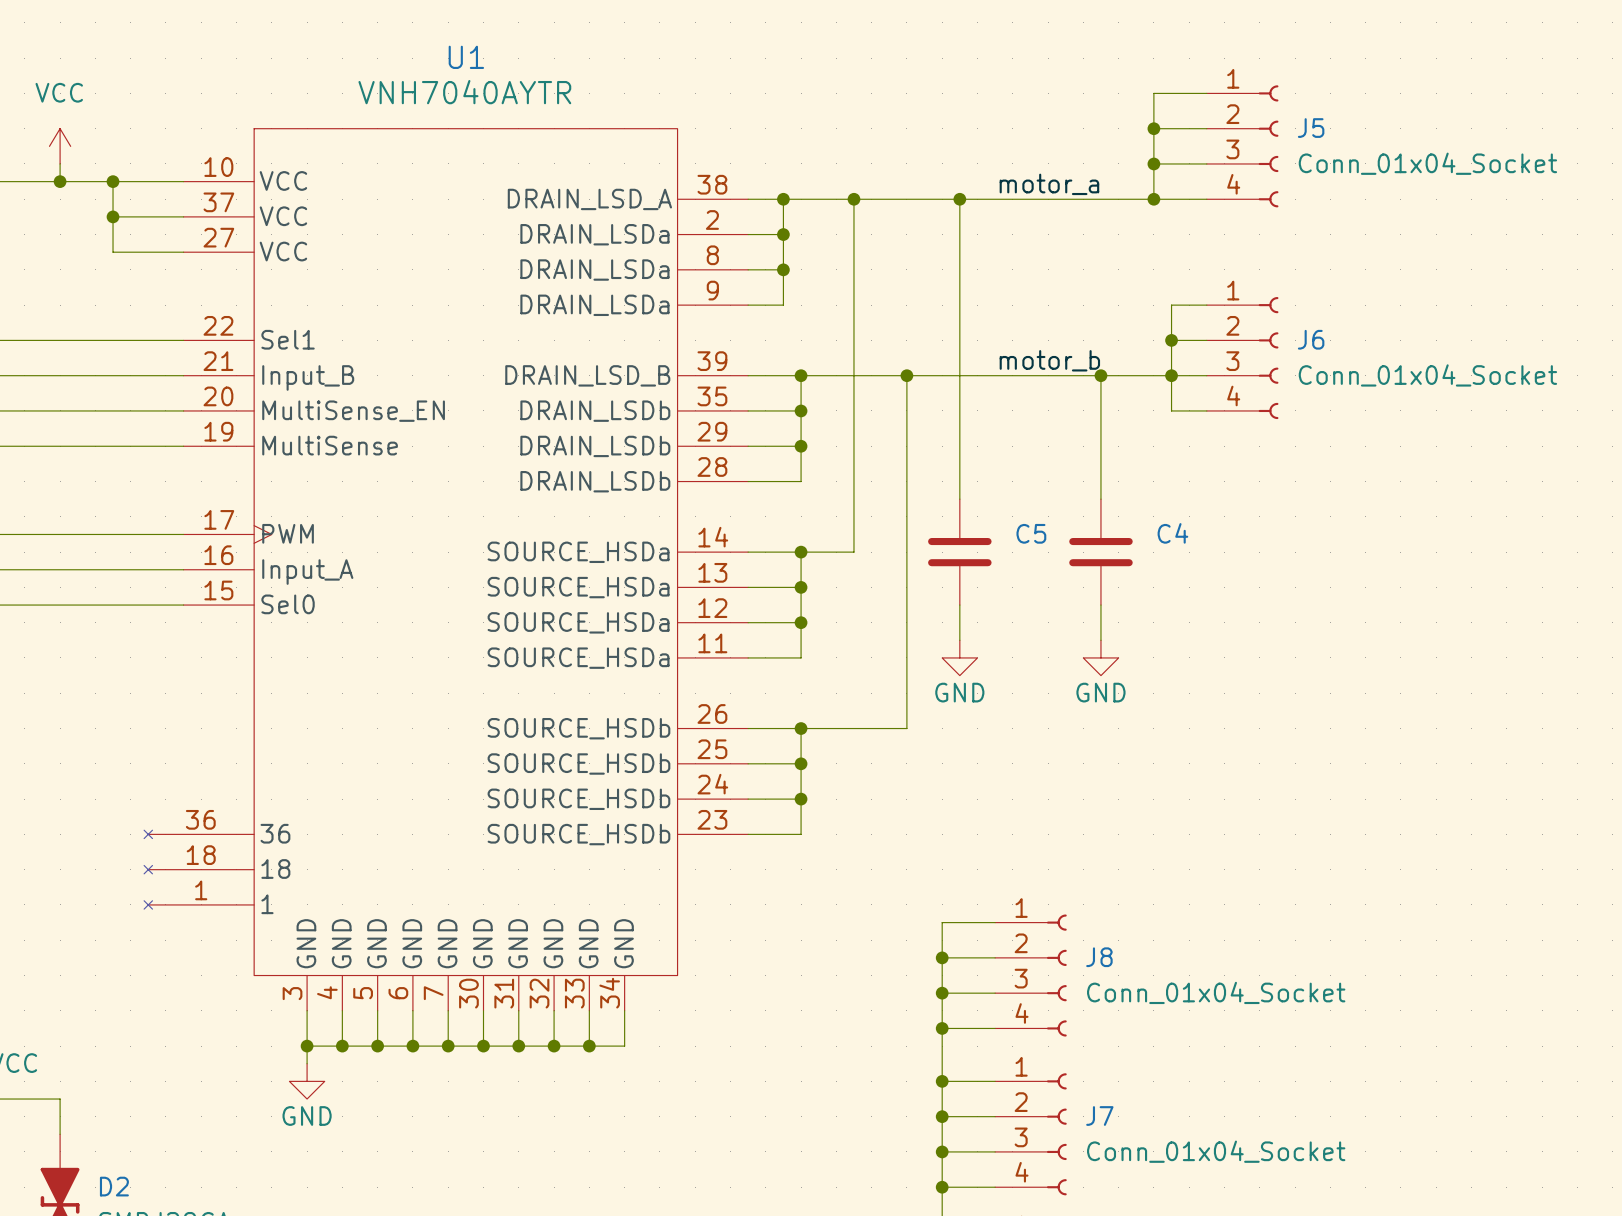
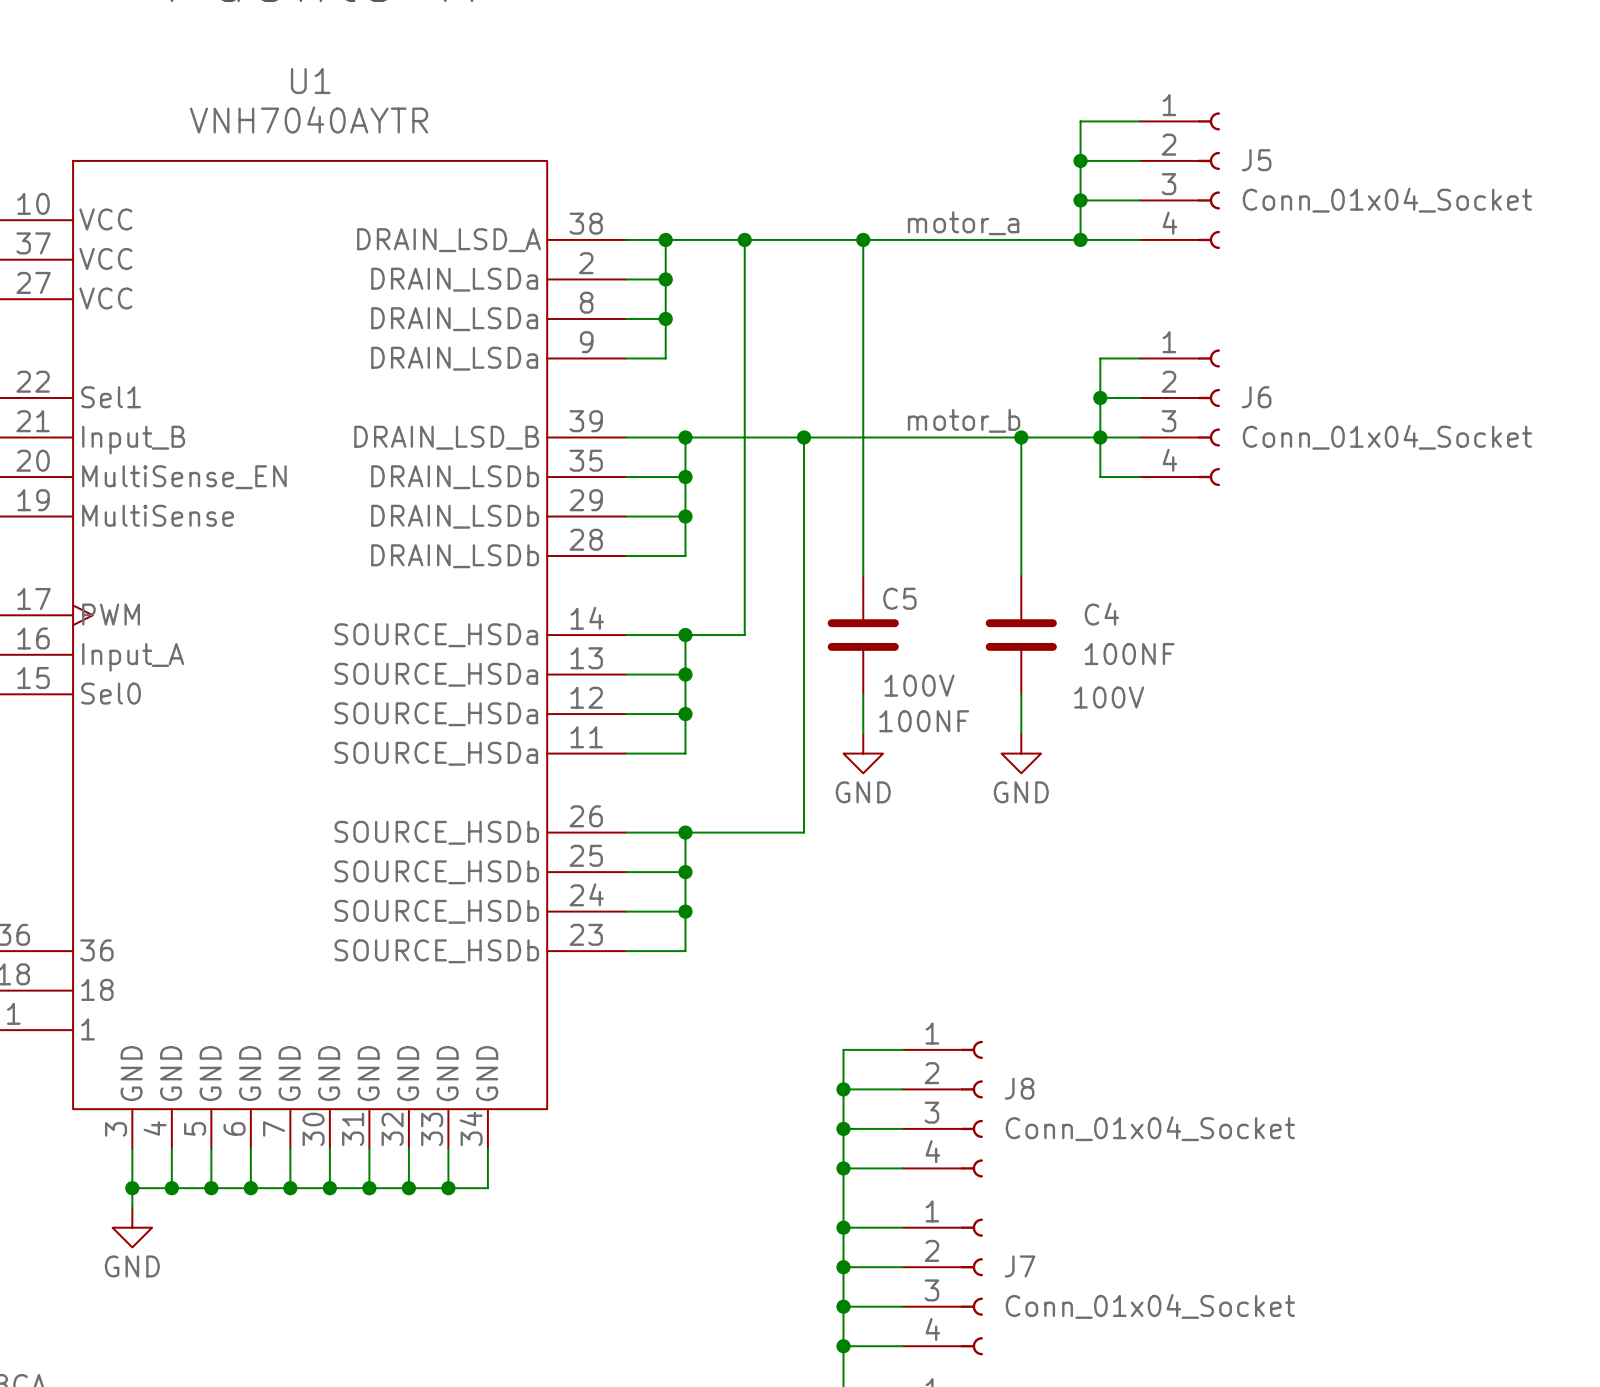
C5 name position: C5 (1031, 533) -> C5 (899, 598)
C4 value: none -> 100NF (1129, 654)
C5 text: none -> 100V (919, 685)
C4 text: none -> 100V (1109, 697)
C5 value: none -> 100NF (924, 721)

